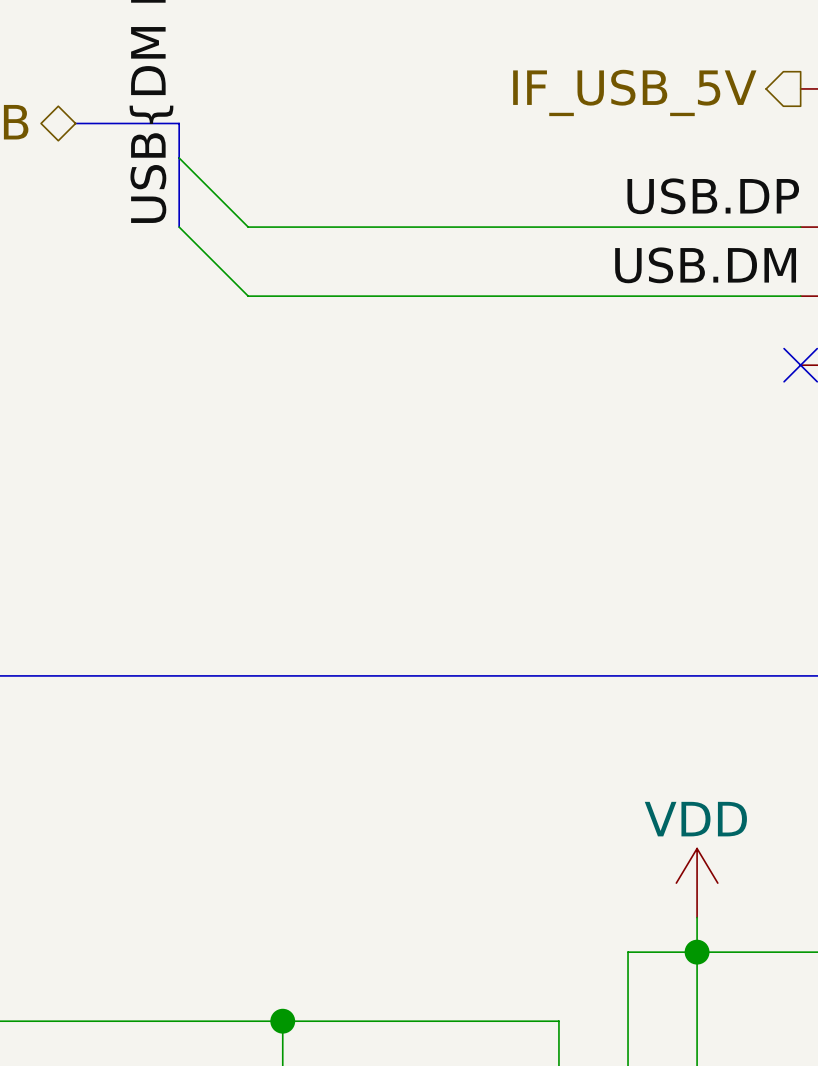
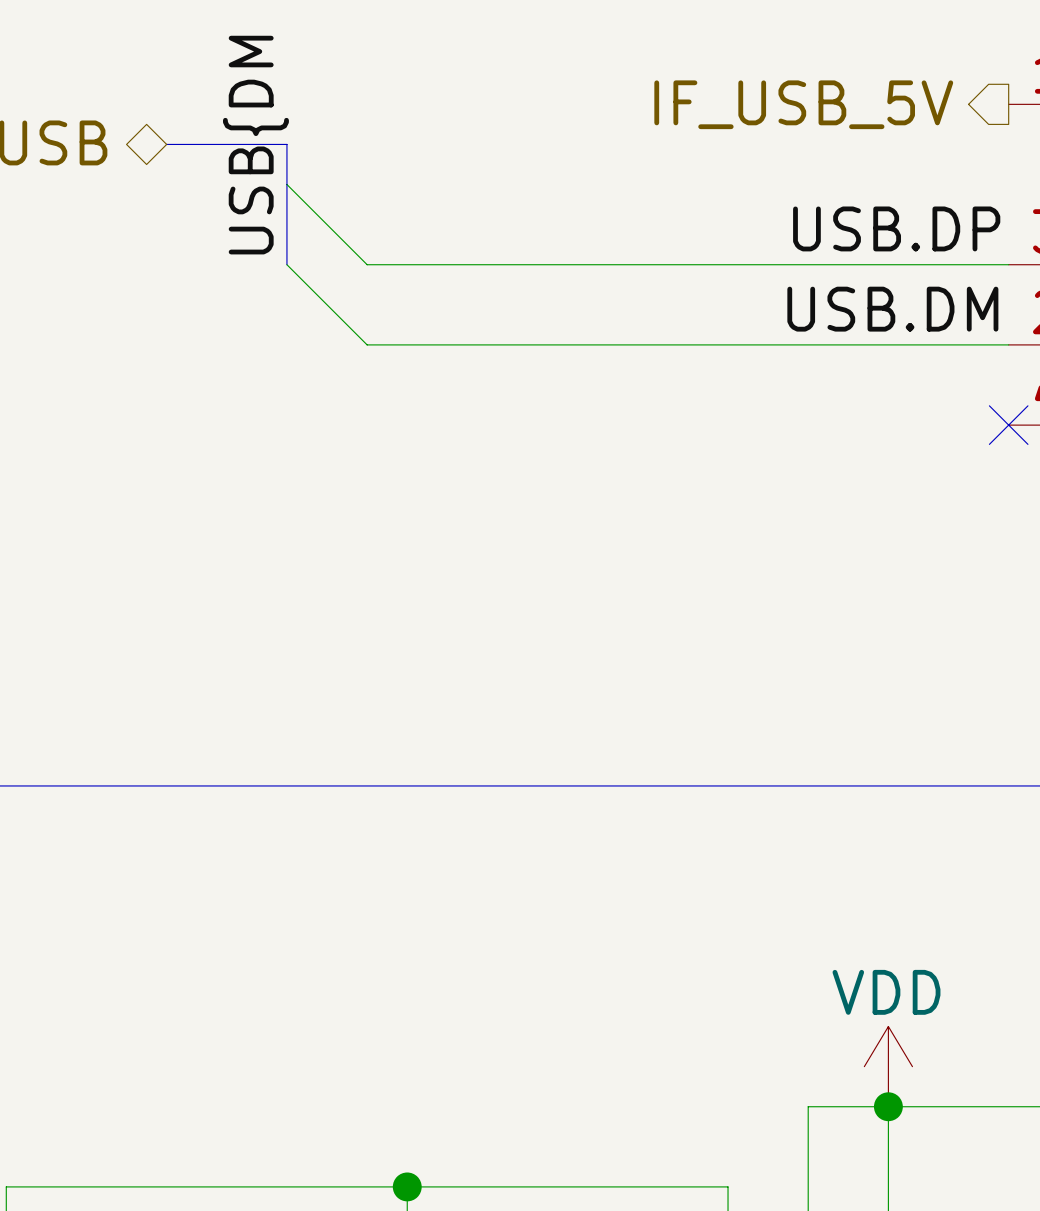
power symbol position: VDD (697, 883) -> VDD (888, 1066)

